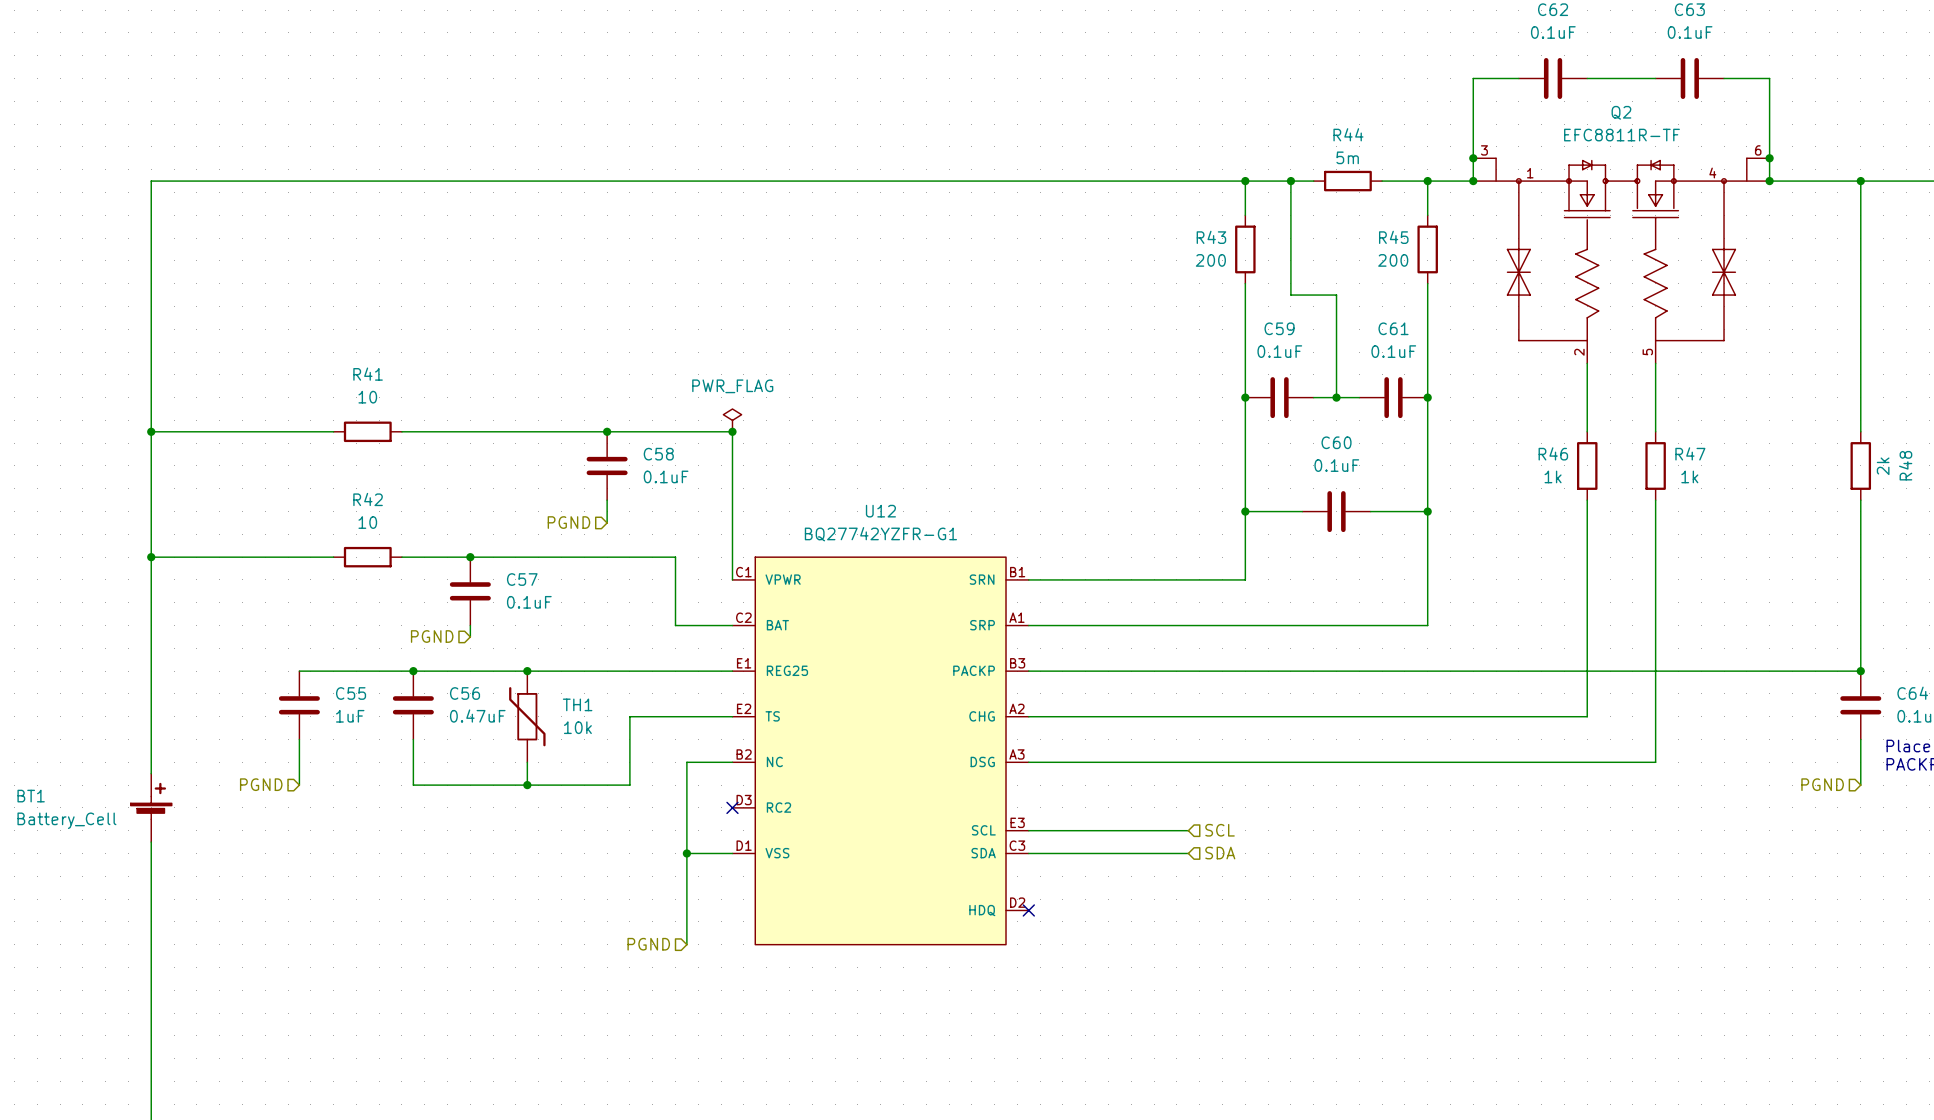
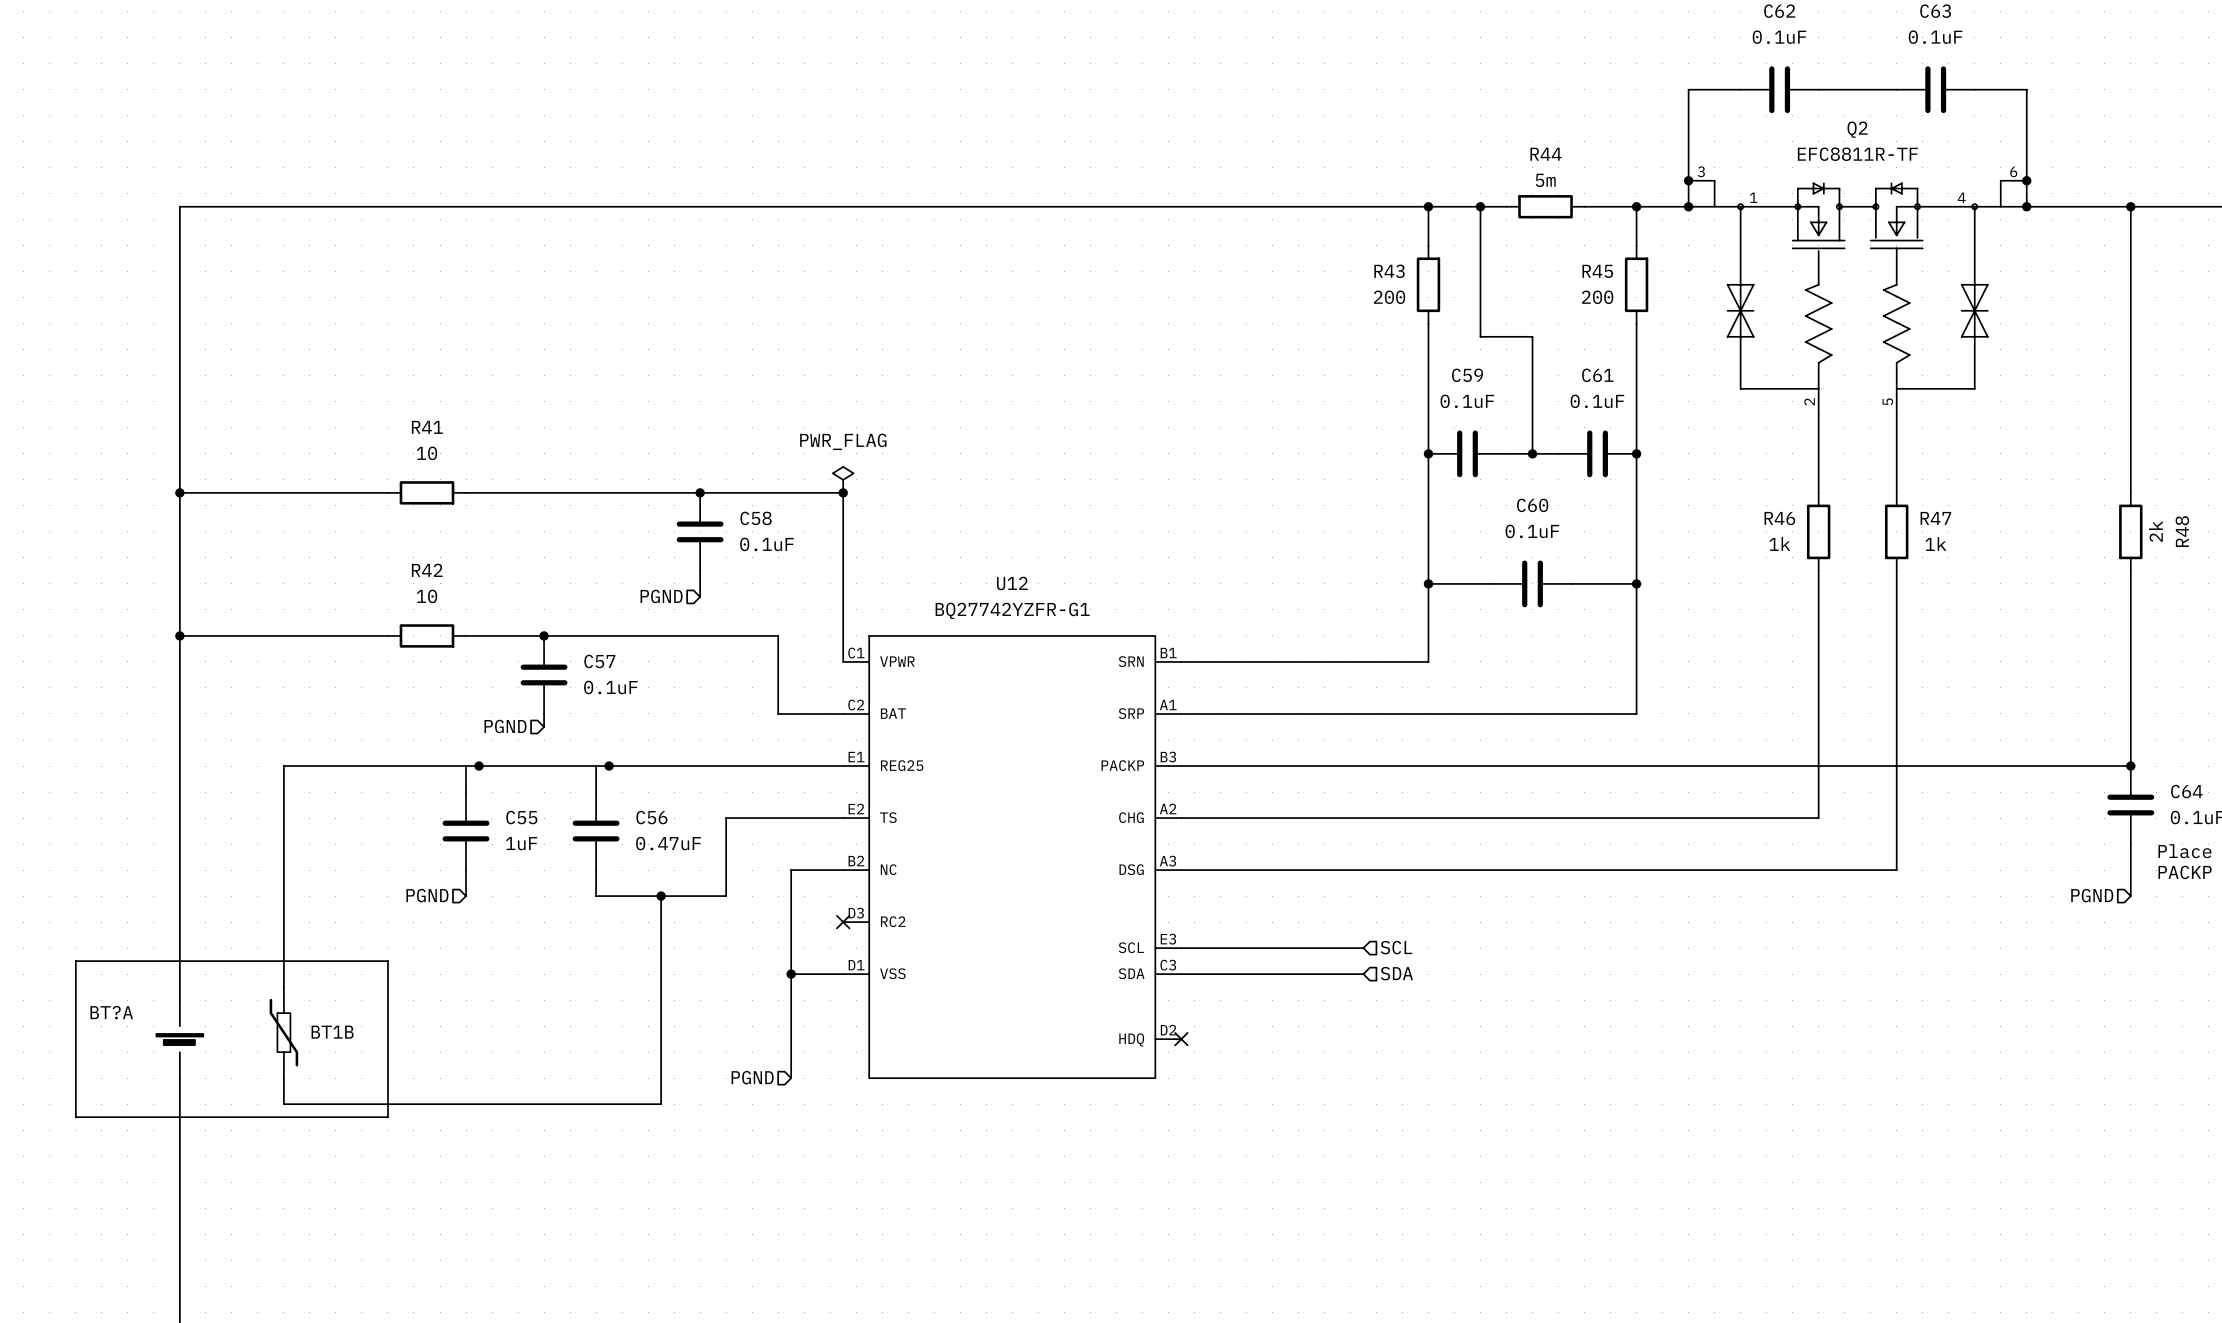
wire: none -> (348, 766) (283, 766) (283, 987)
wire: none -> (466, 766) (466, 792)
C55 position: (299, 705) -> (466, 831)
C56 position: (413, 705) -> (596, 831)
TH1: 10k (527, 716) -> none
wire: (299, 739) (299, 785) -> none
wire: (413, 739) (413, 785) (515, 785) -> (596, 870) (596, 896)
wire: none -> (466, 870) (466, 896)
wire: (527, 762) (527, 785) -> (596, 766) (596, 792)
hierarchical label position: PGND (261, 784) -> PGND (427, 895)
junction position: (527, 785) -> (661, 896)
wire: none -> (661, 896) (661, 1104) (283, 1104) (283, 1078)
BT1: Battery_Cell (151, 807) -> none
line: none -> (75, 961) (75, 1117) (387, 1117) (387, 961) (75, 961)
BT1B: none -> (283, 1032)
BT?A: none -> (179, 1039)

